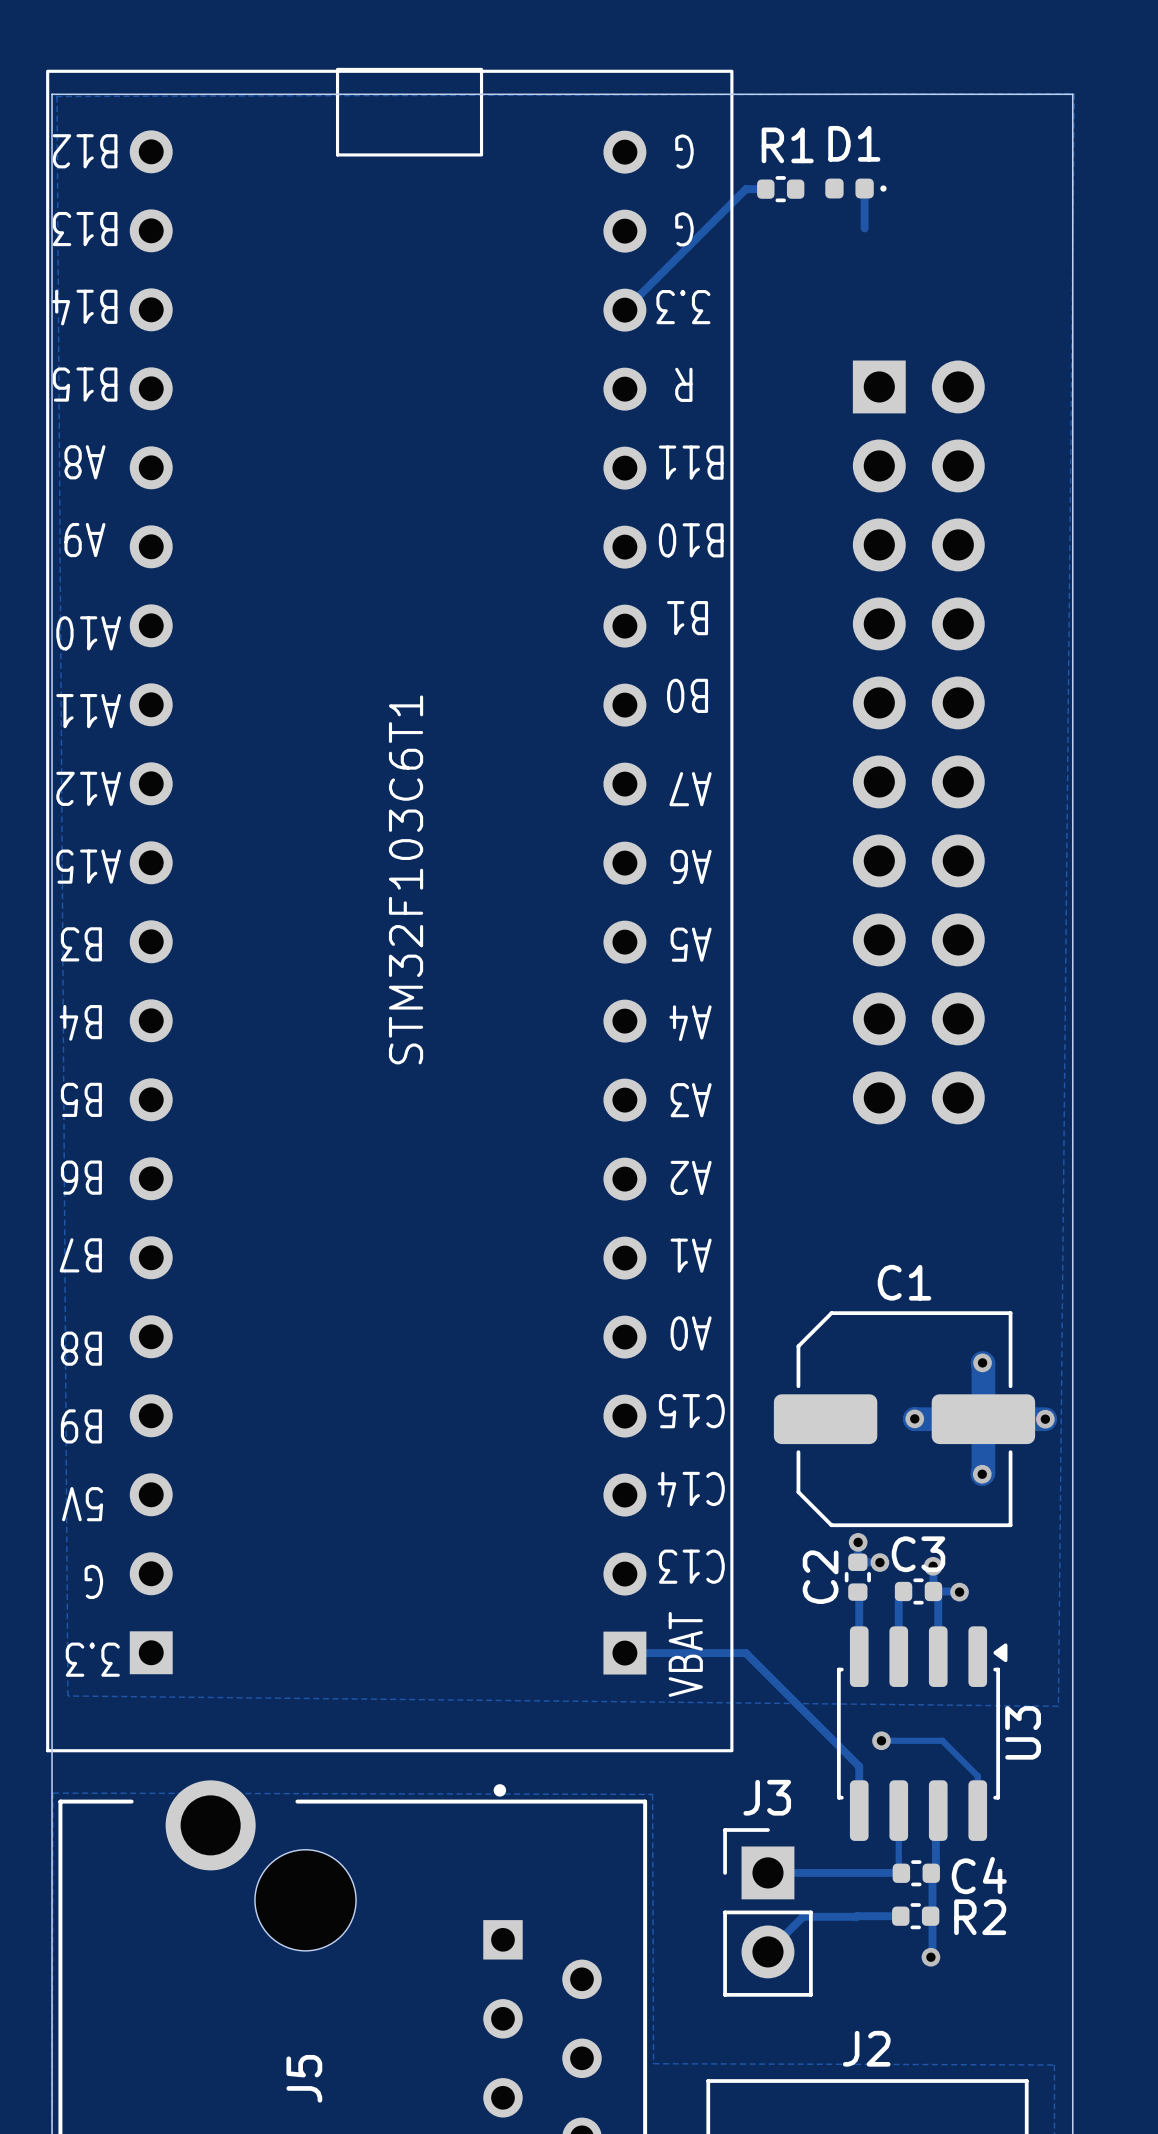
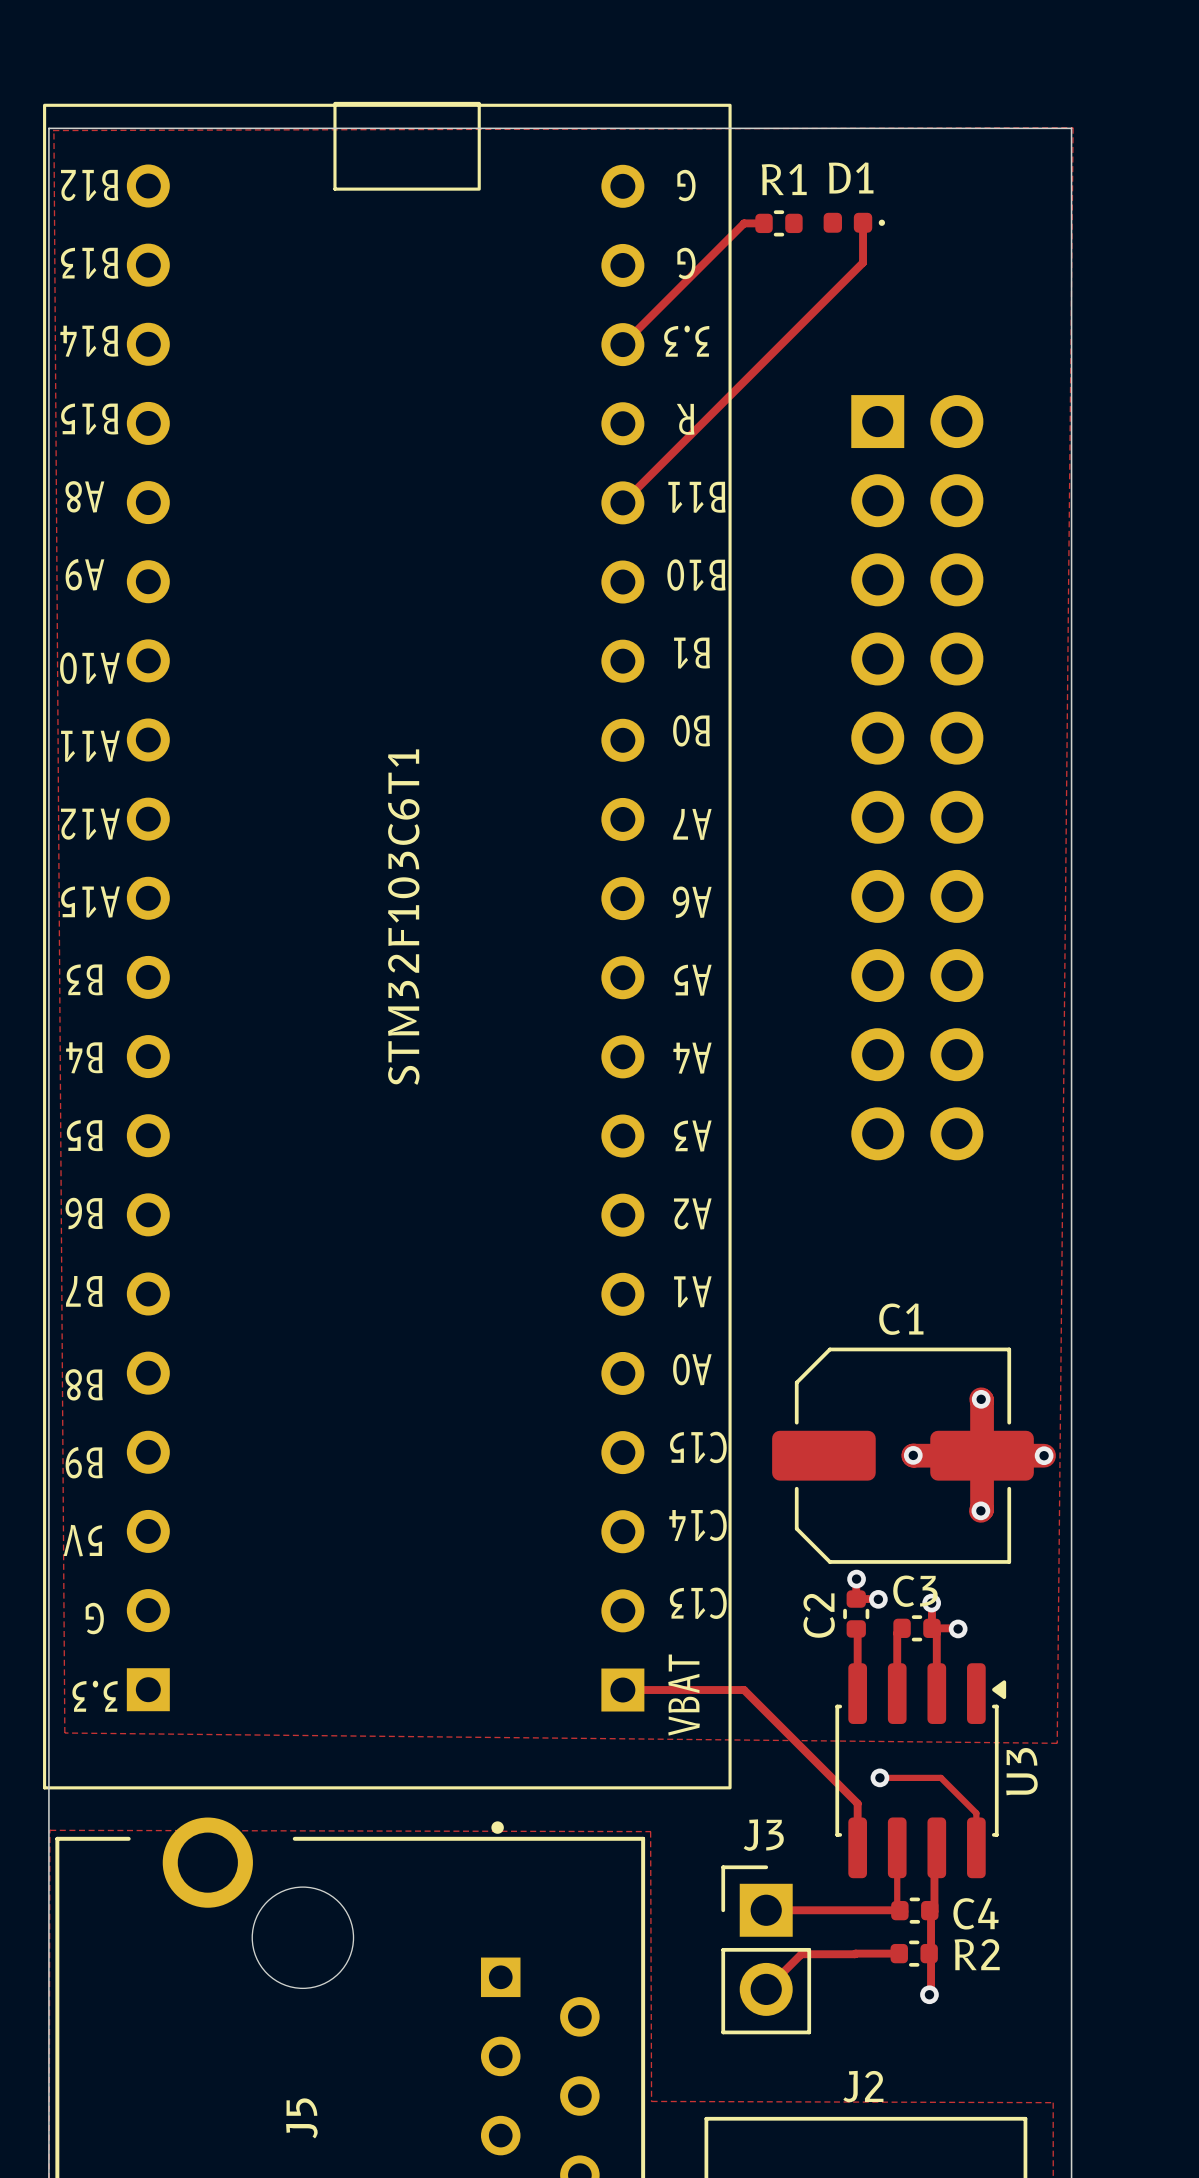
track: none -> (863, 262) (622, 502)

